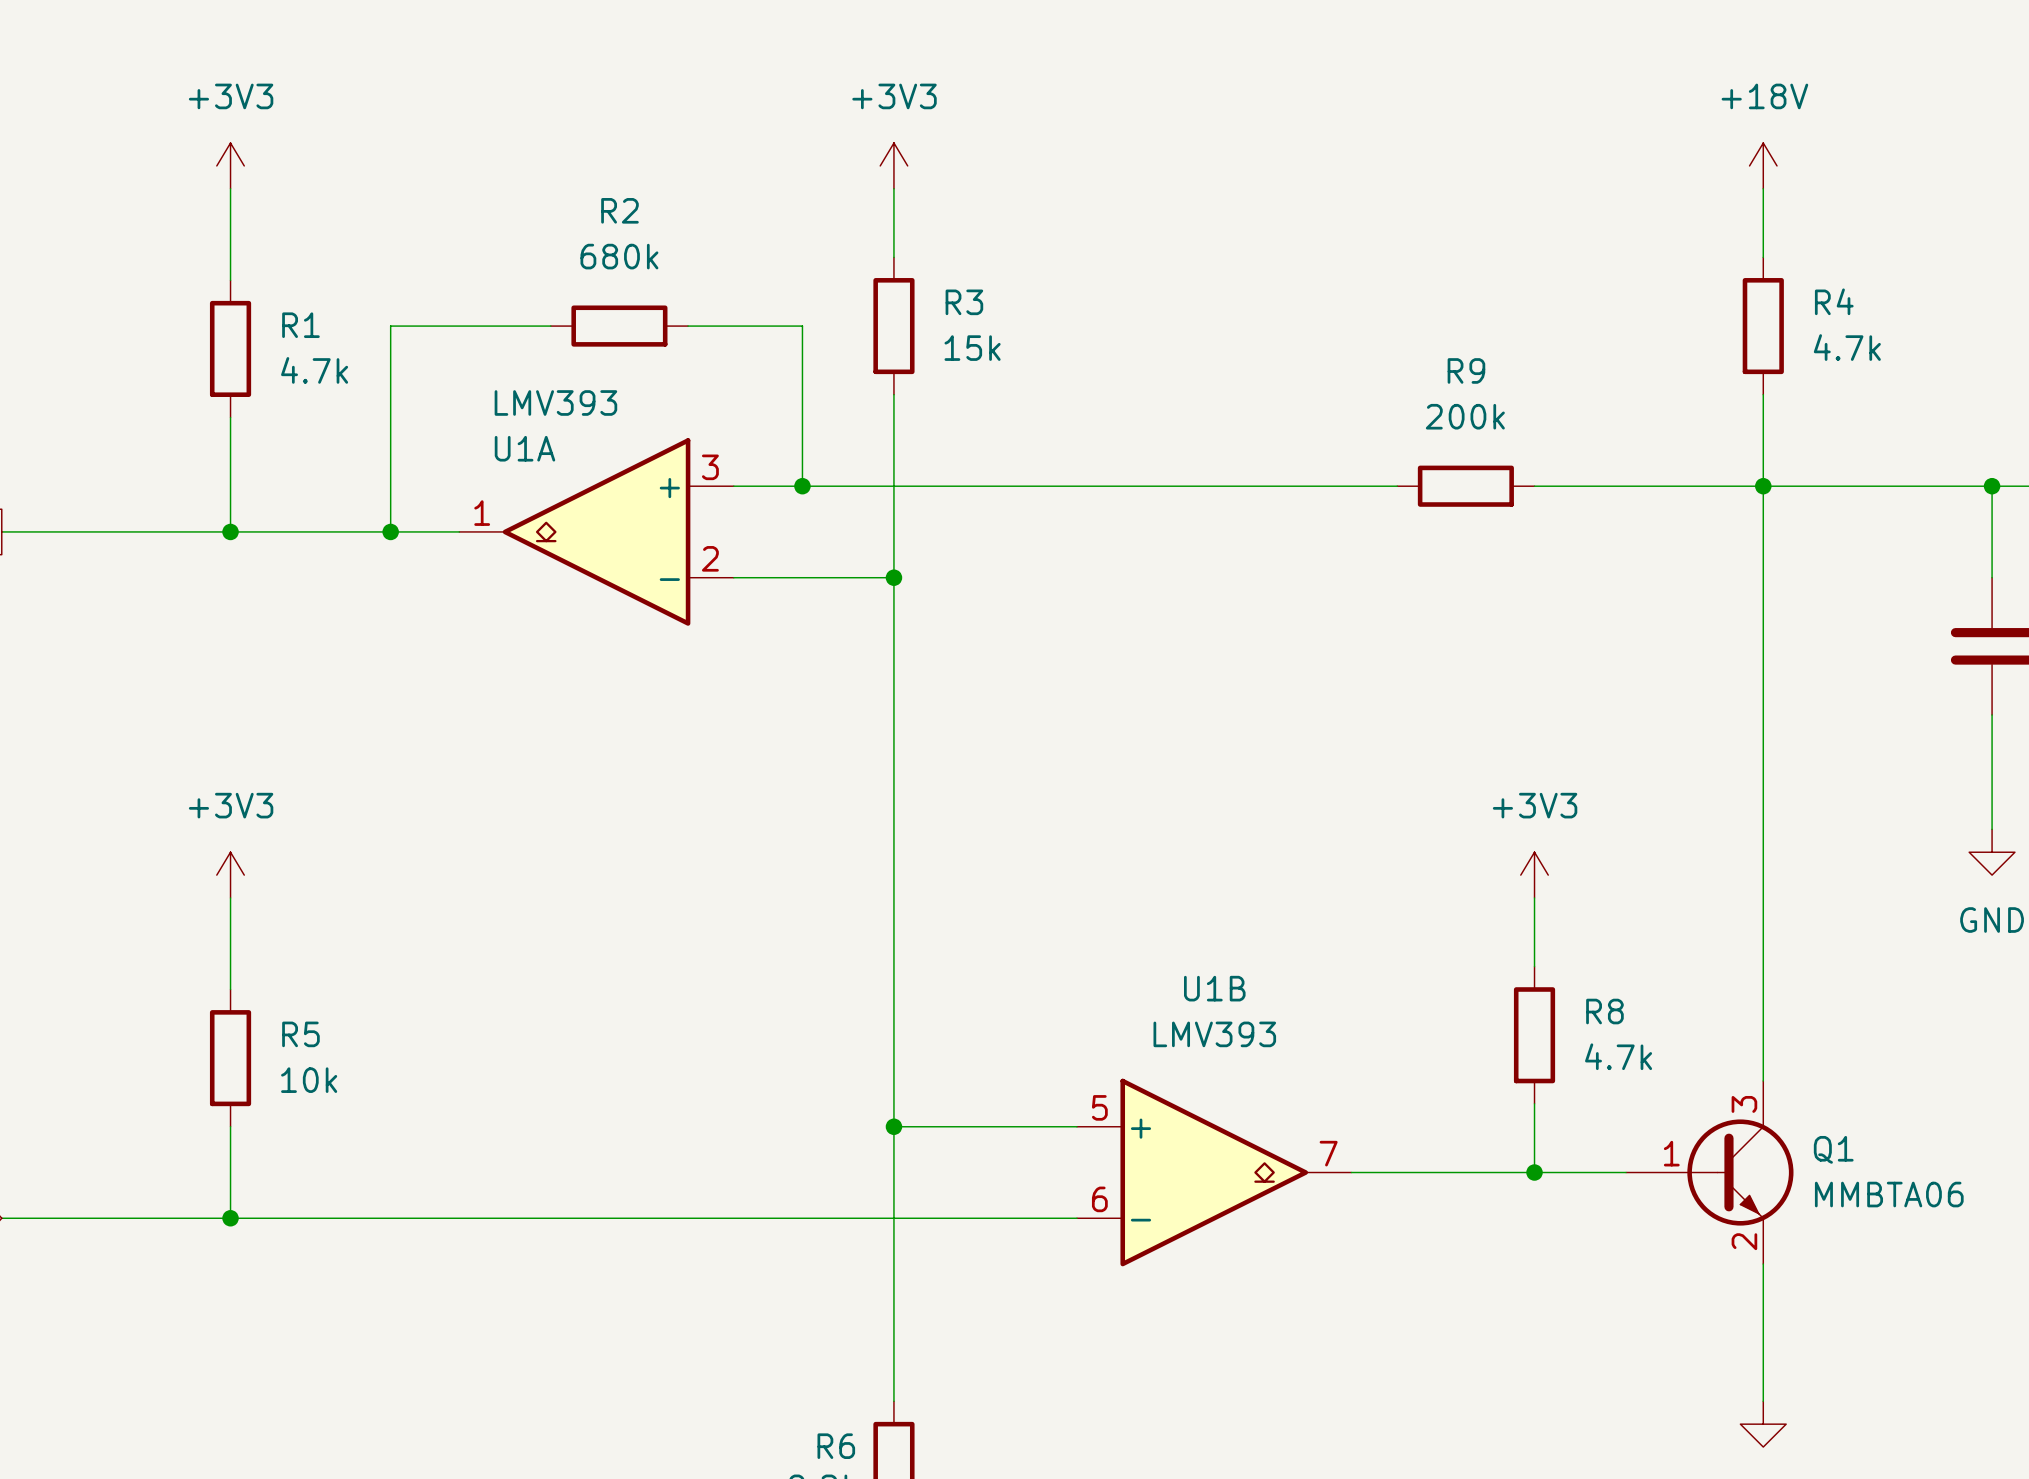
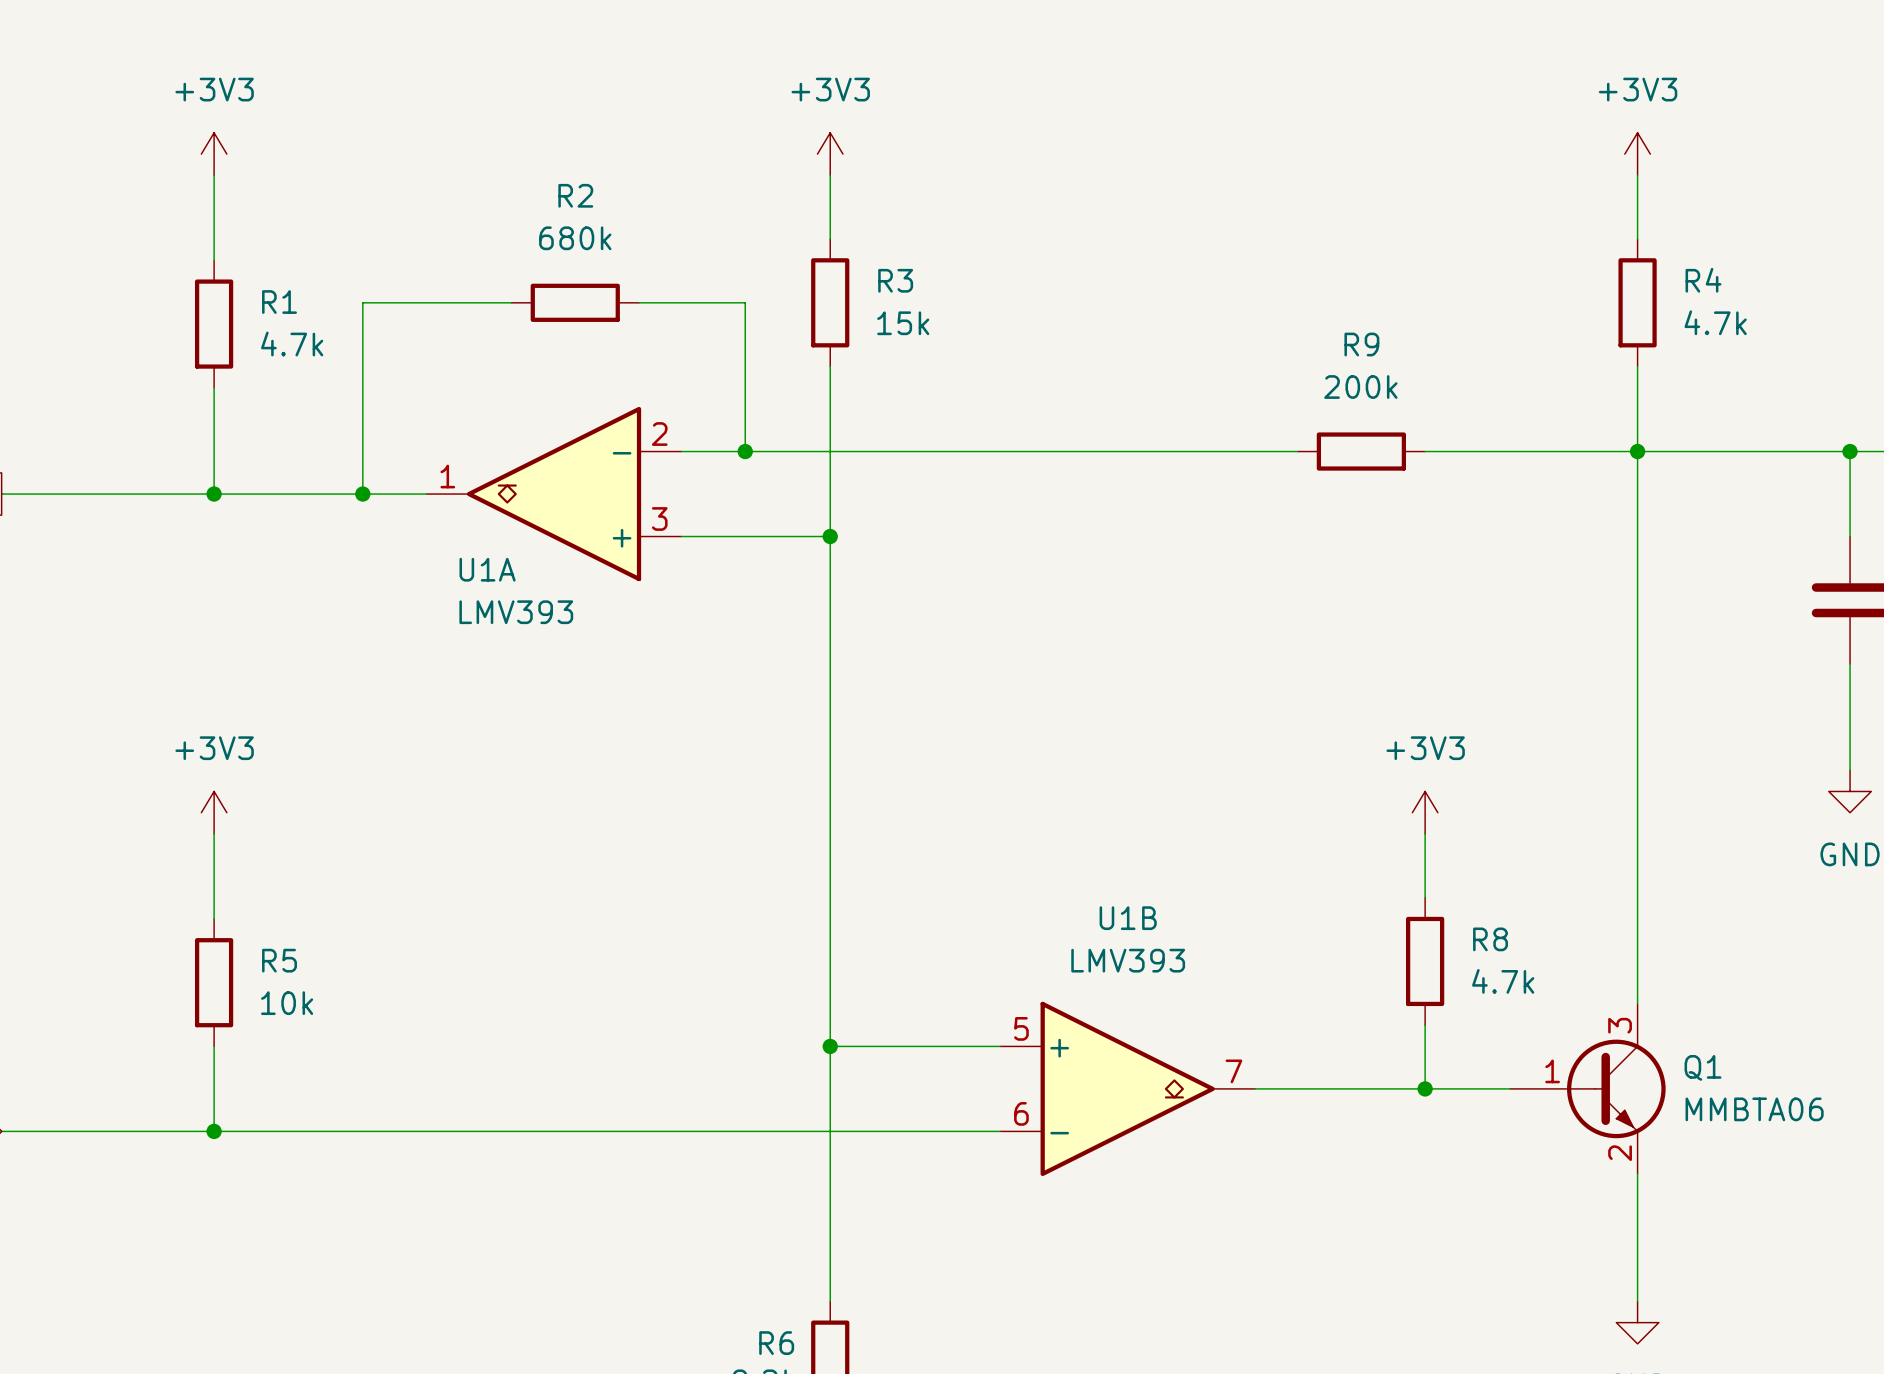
power symbol: +18V (1763, 165) -> +3V3 (1637, 154)
U1A flip: as is (596, 531) -> up-down (554, 494)

